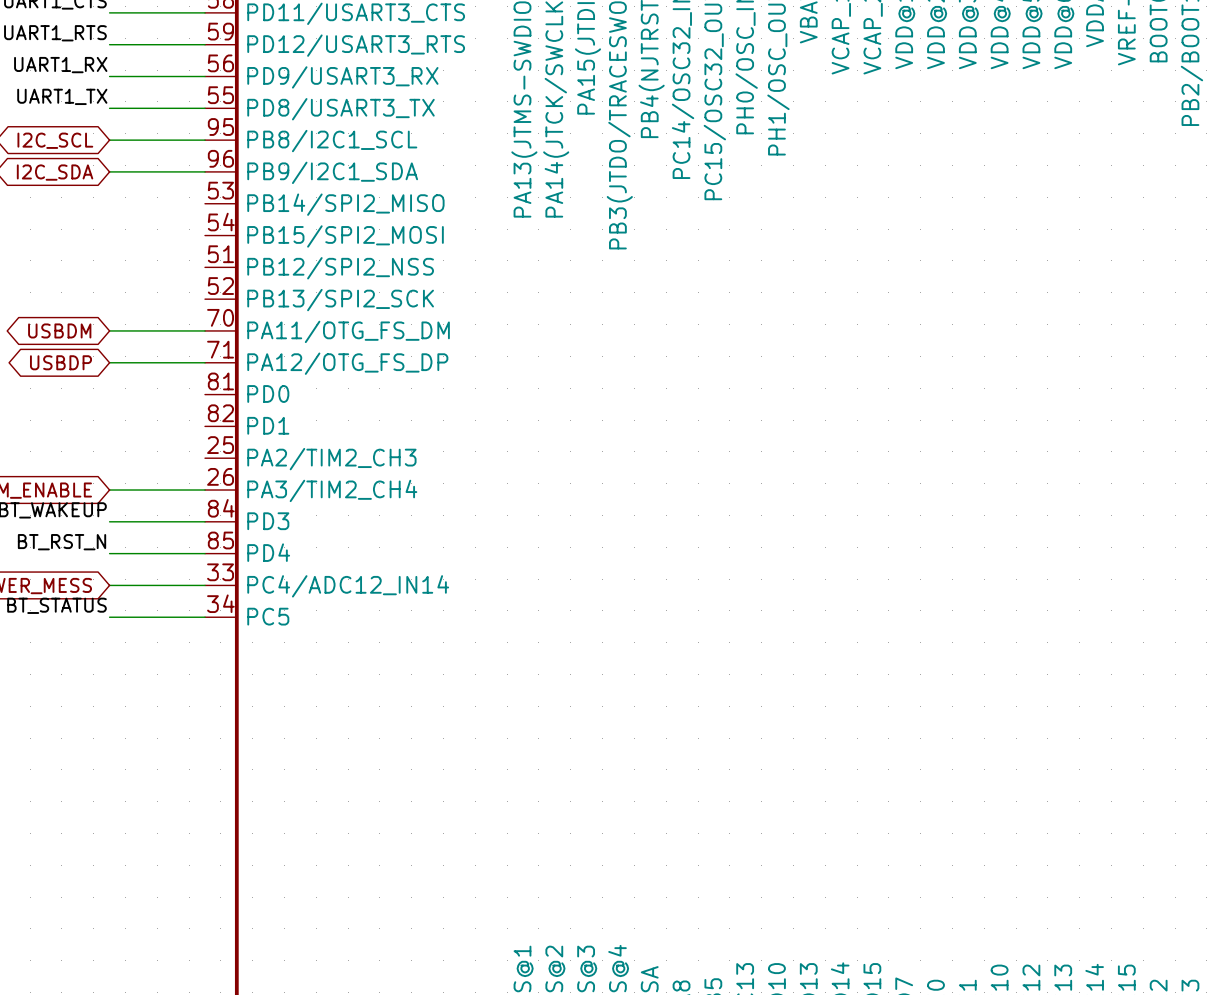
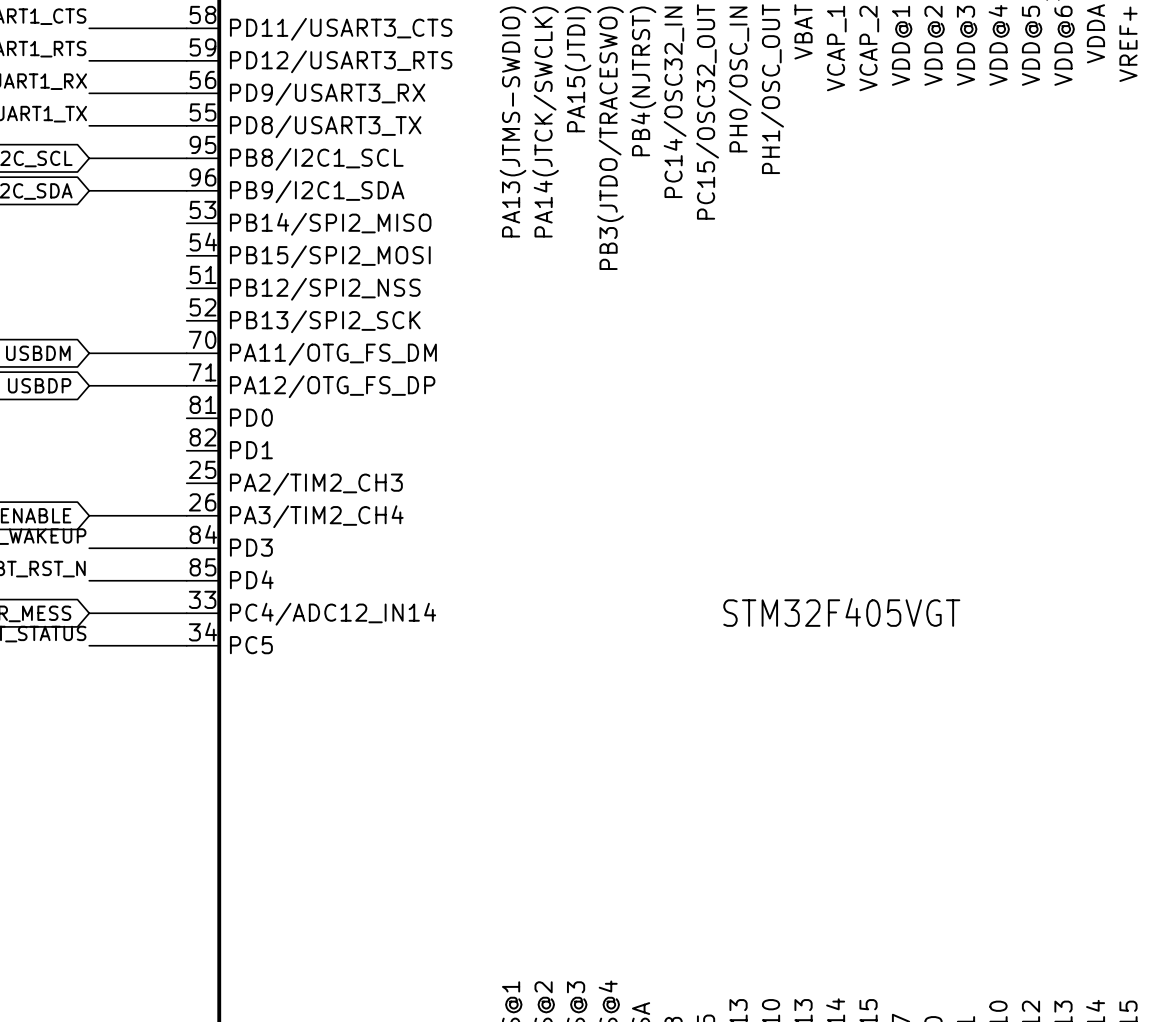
part value: none -> STM32F405VGT (841, 612)

